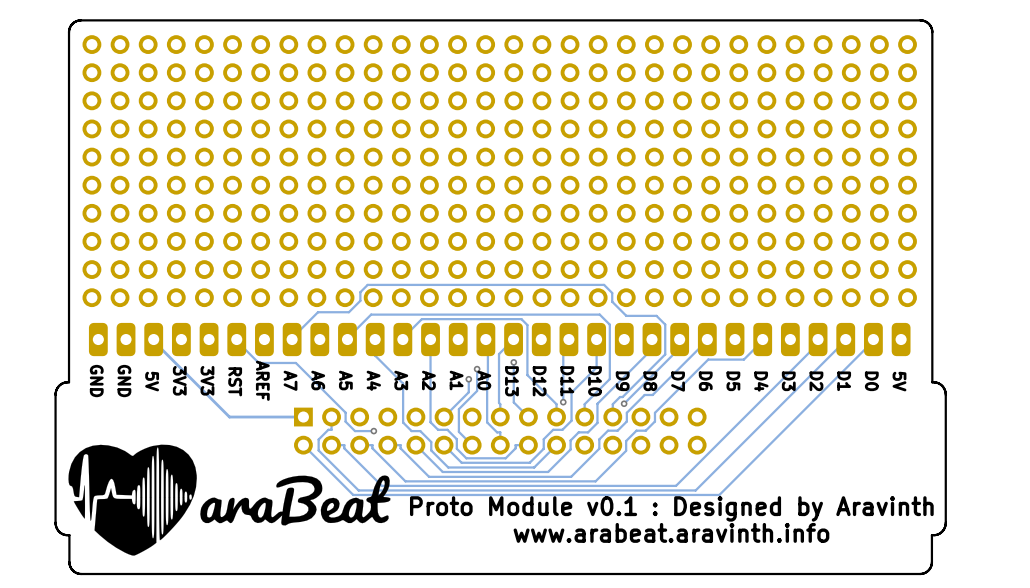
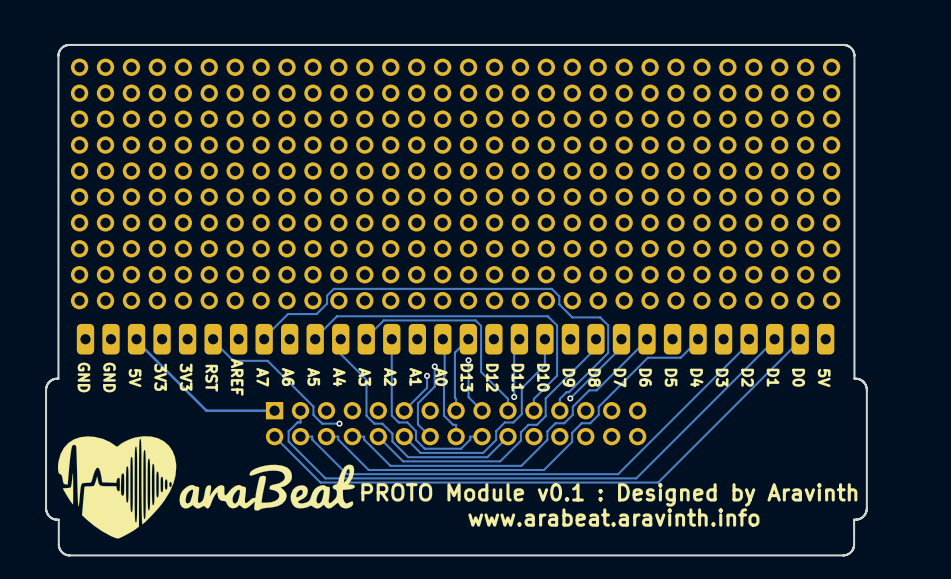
text: Proto Module v0.1 : Designed by Aravinth (671, 508) -> PROTO Module v0.1 : Designed by Aravinth (609, 494)

